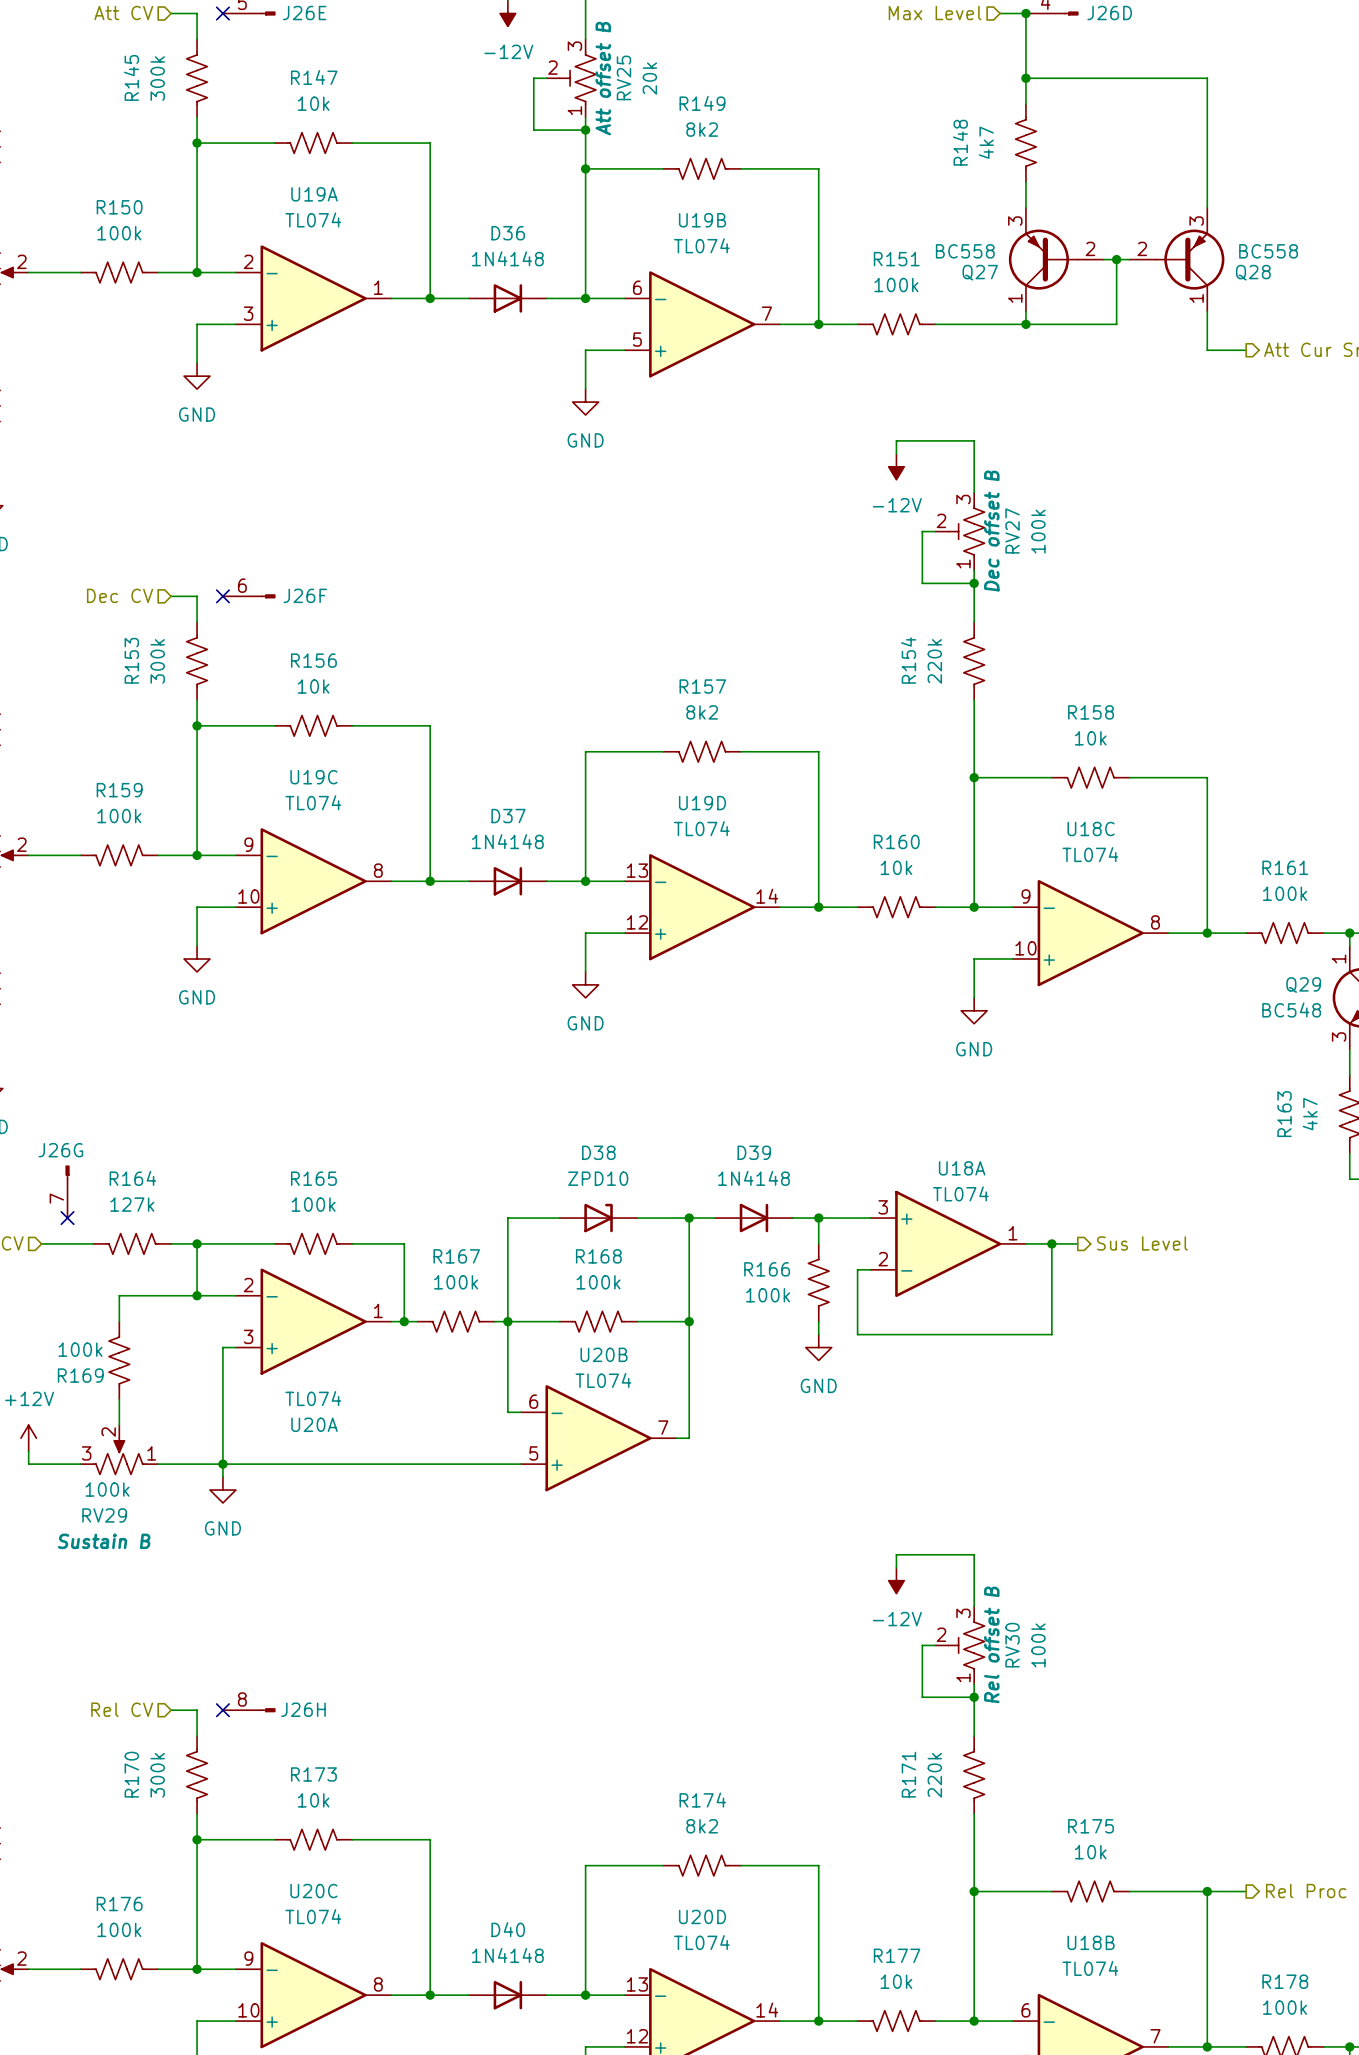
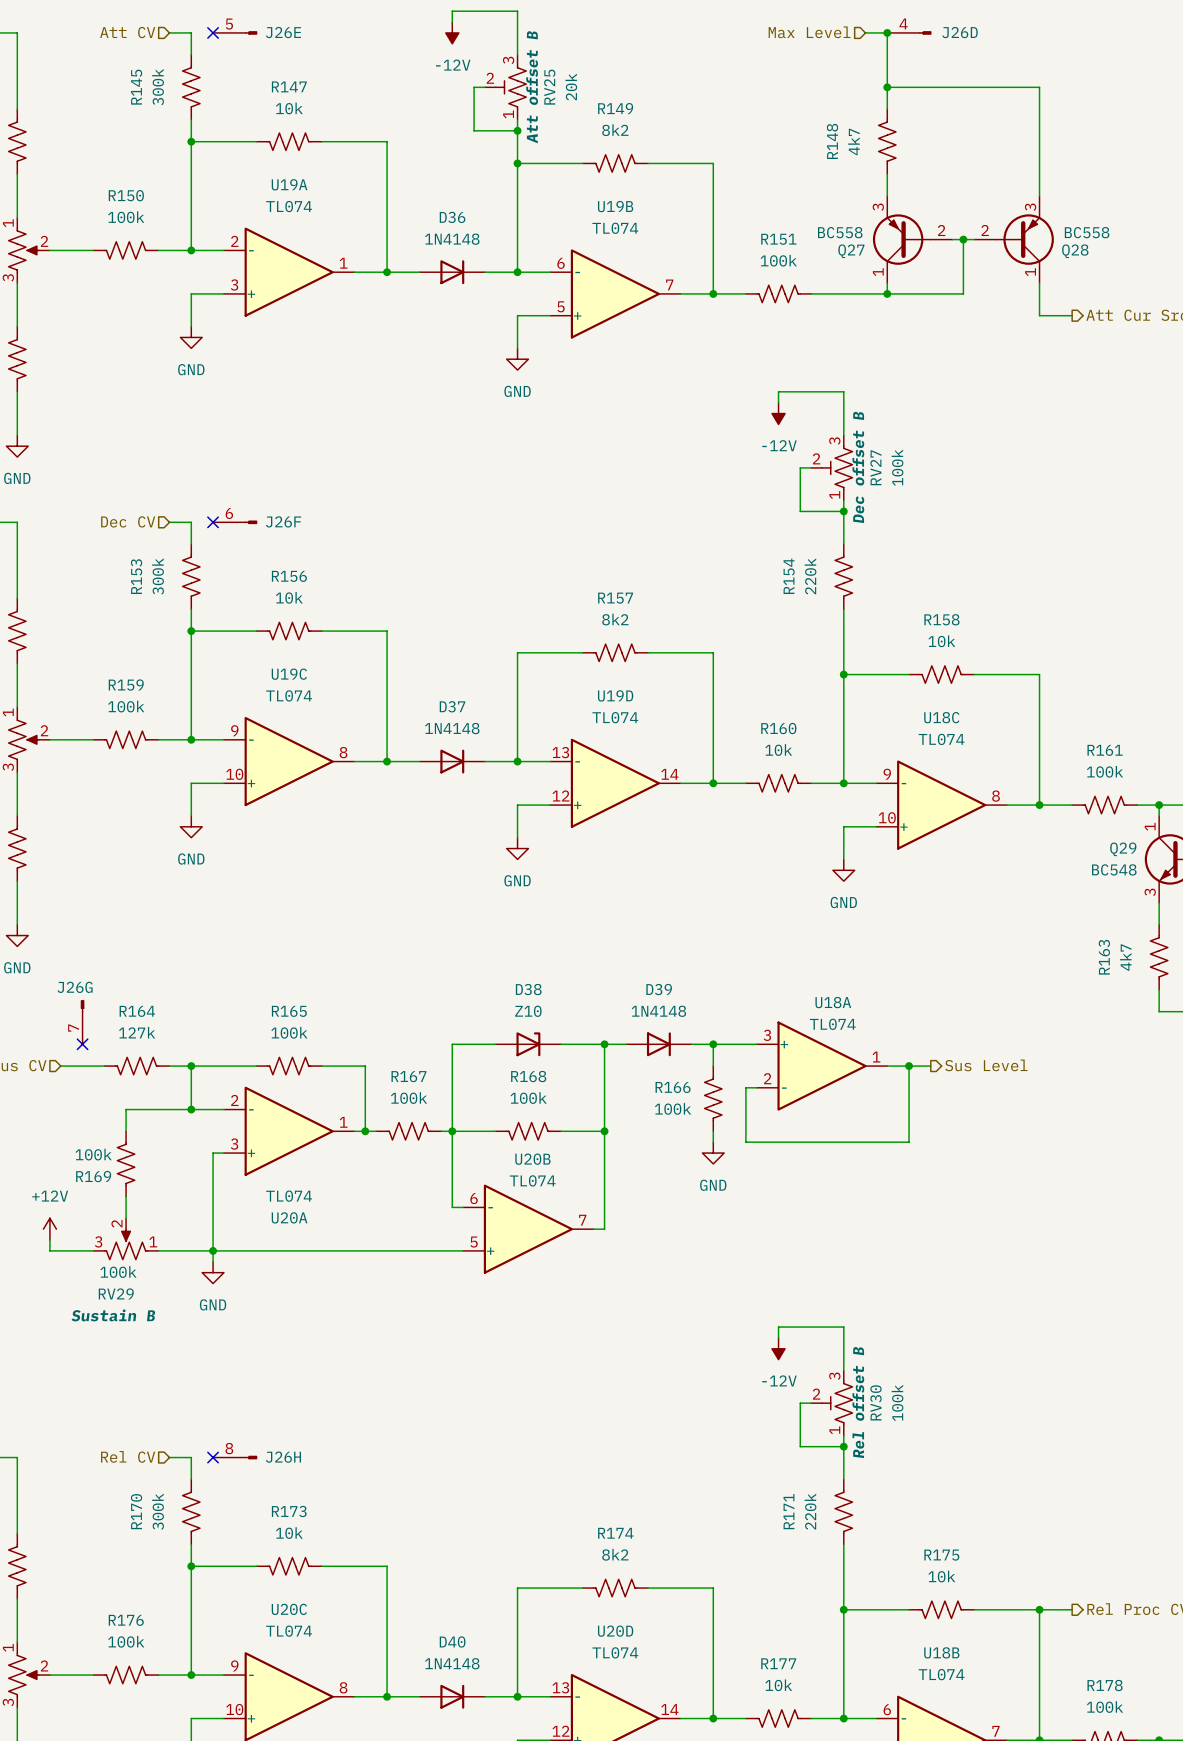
D38 value: ZPD10 (598, 1178) -> Z10 (528, 1011)

